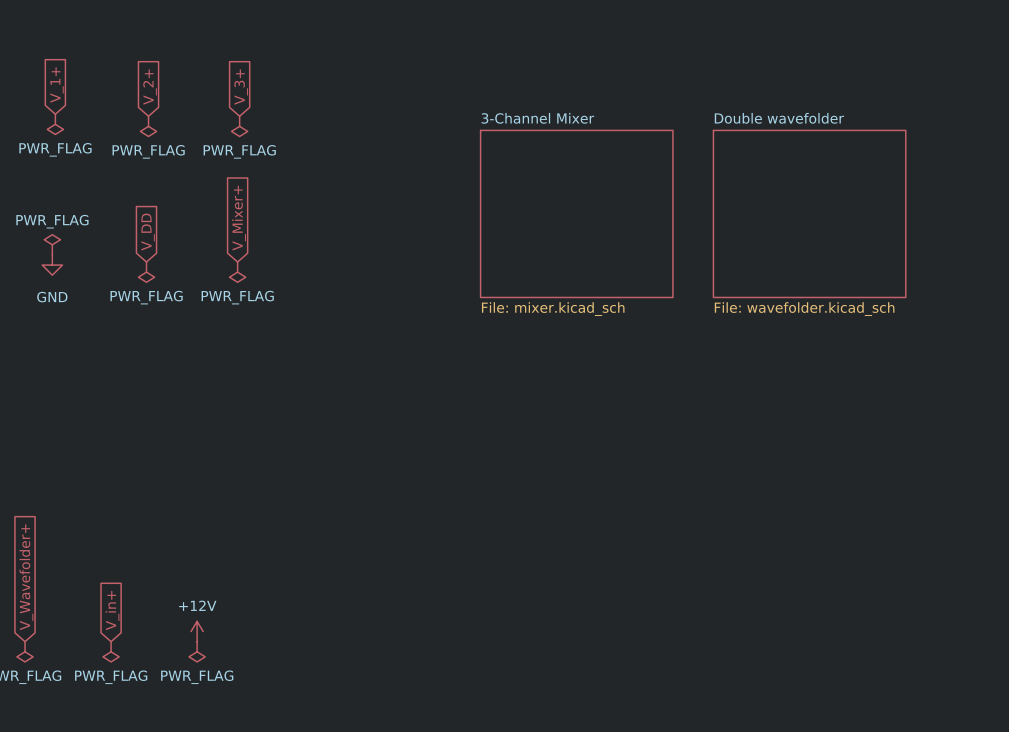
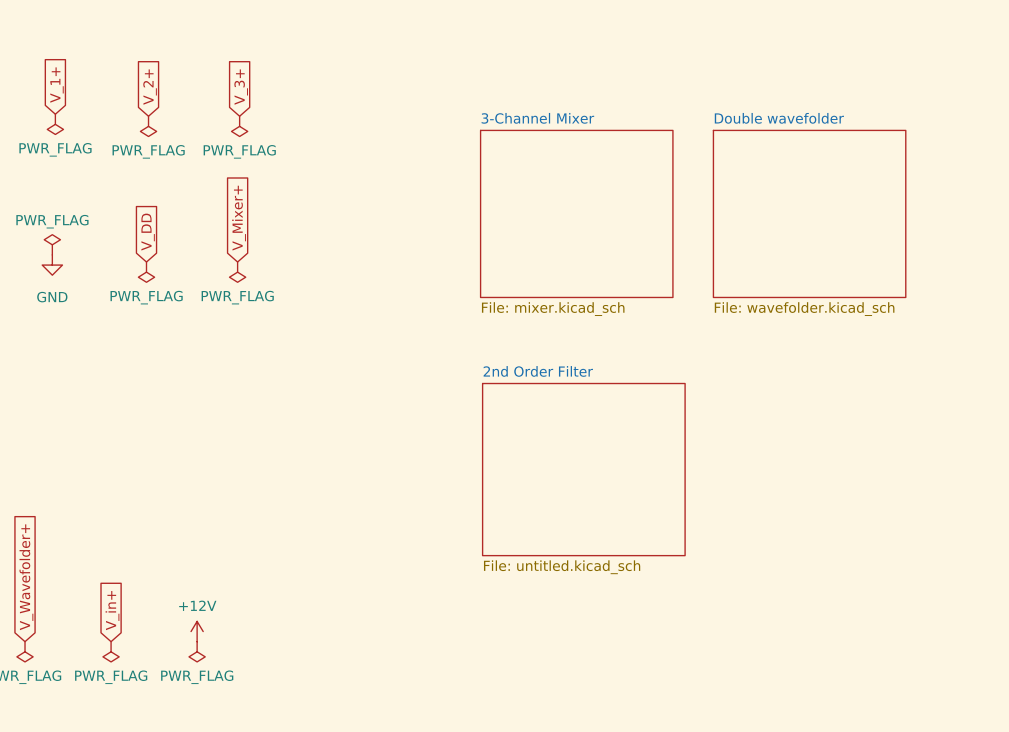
sheet 2nd Order Filter: none -> File: untitled.kicad_sch (583, 469)

